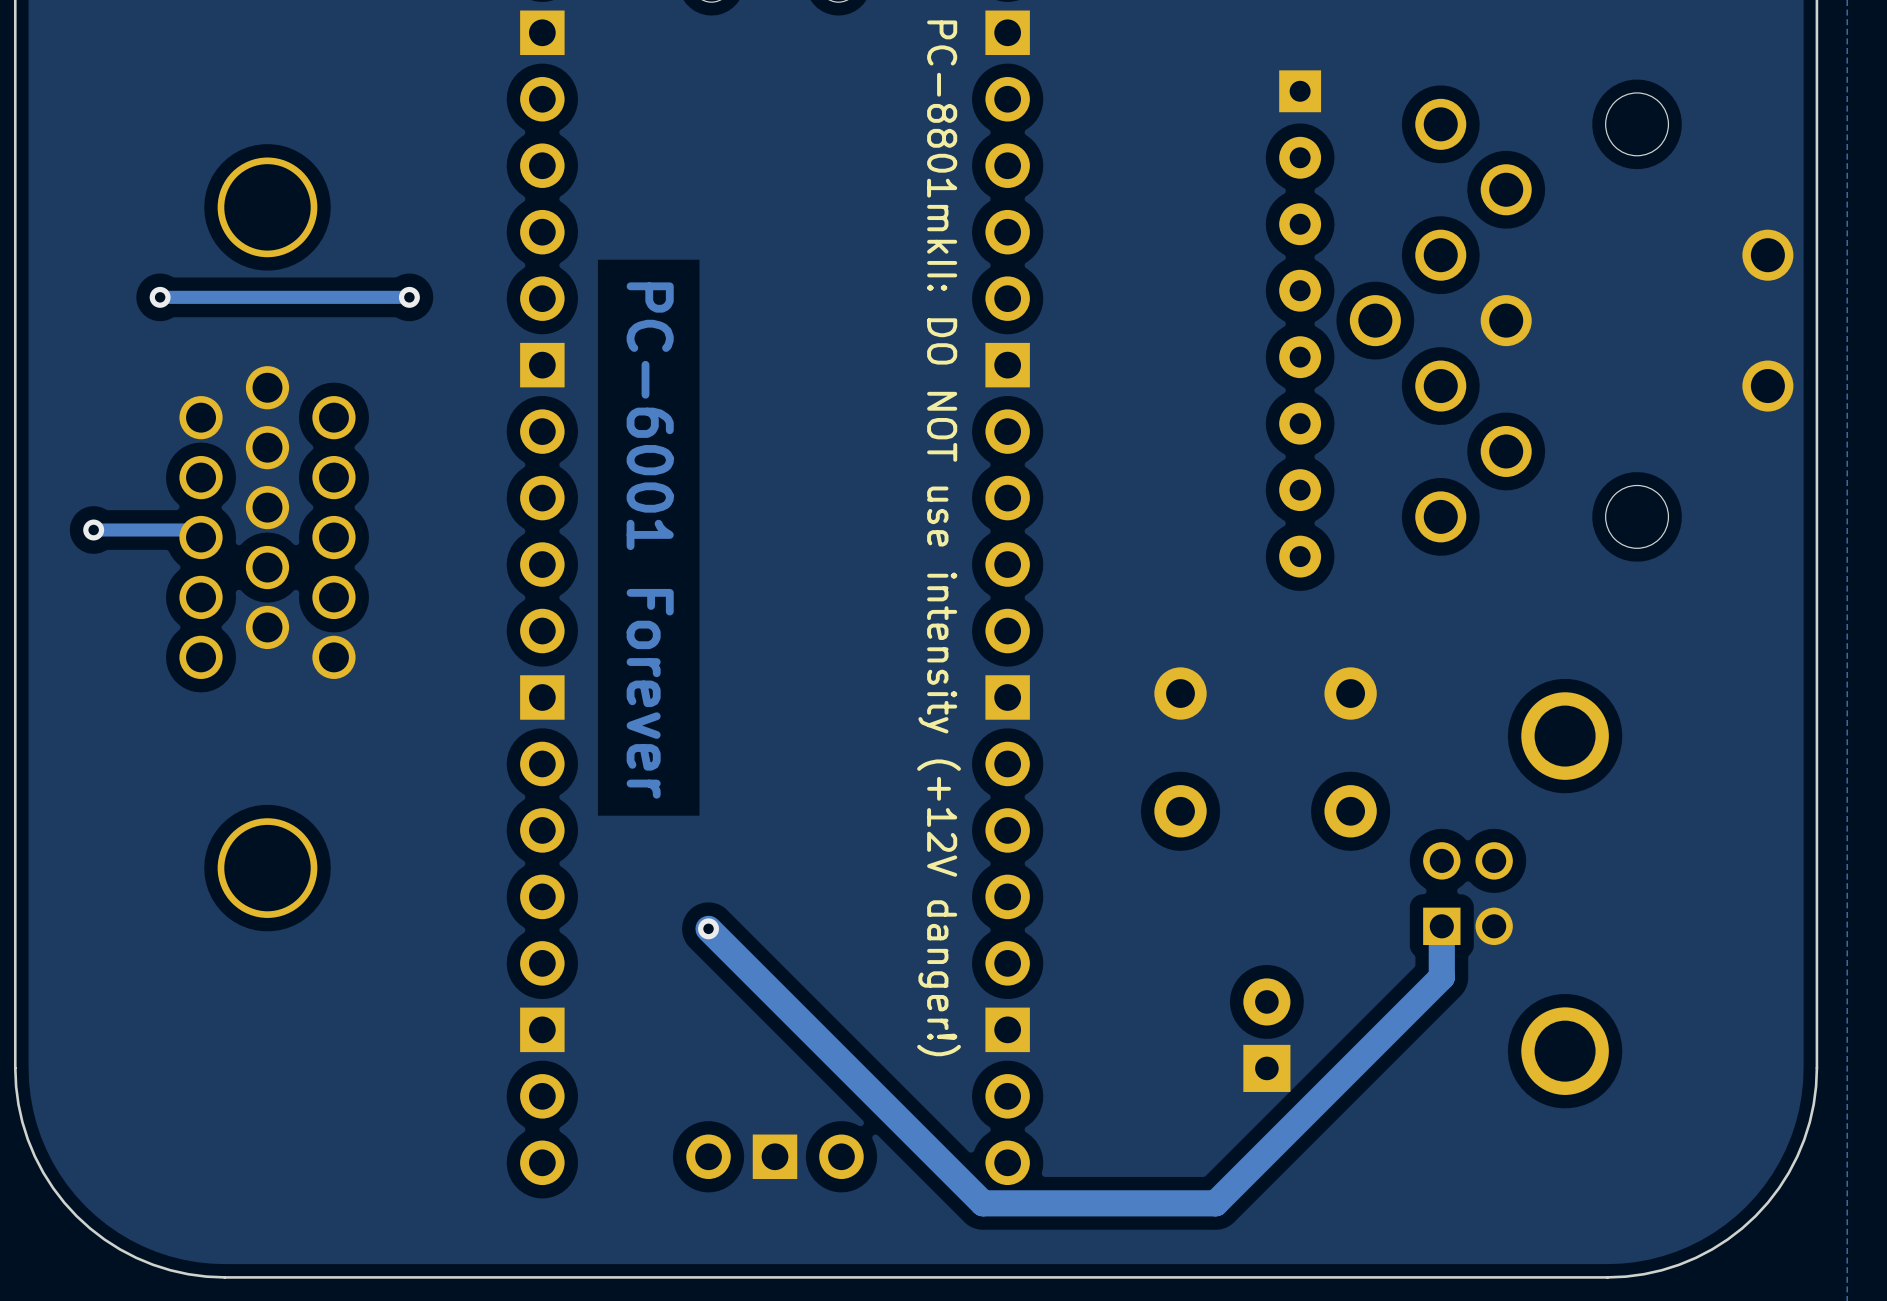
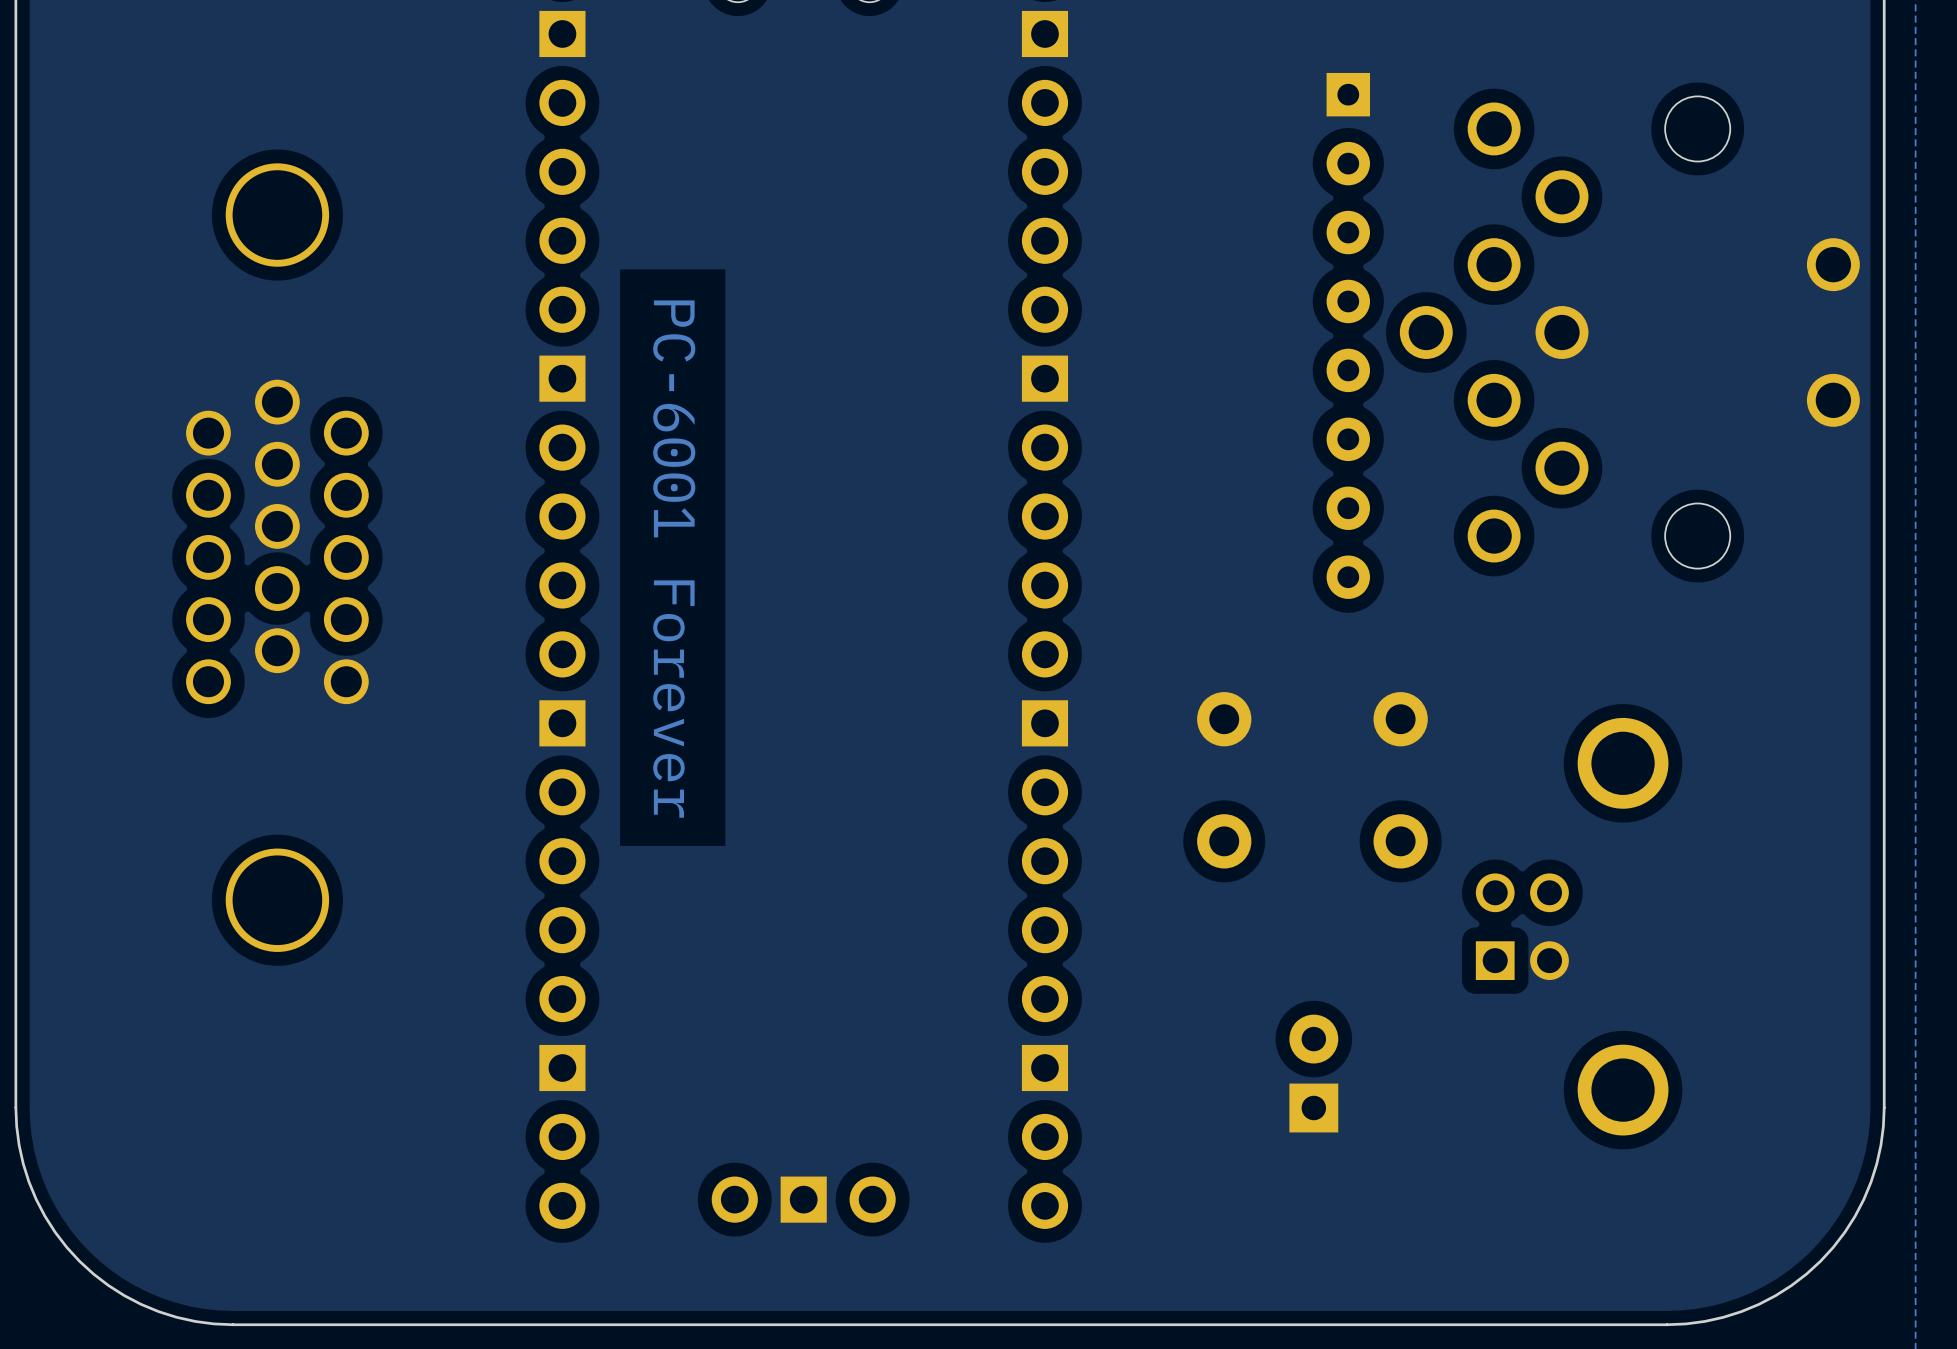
via: (160, 297) -> none
track: (409, 297) (160, 297) -> none
via: (409, 297) -> none
track: (93, 530) (193, 530) (201, 537) -> none
via: (93, 530) -> none
text: PC-8801mkII: DO NOT use intensity (+12V danger!) (939, 538) -> none
track: (1441, 926) (1441, 977) (1215, 1203) (983, 1203) (708, 928) -> none
via: (708, 928) -> none

